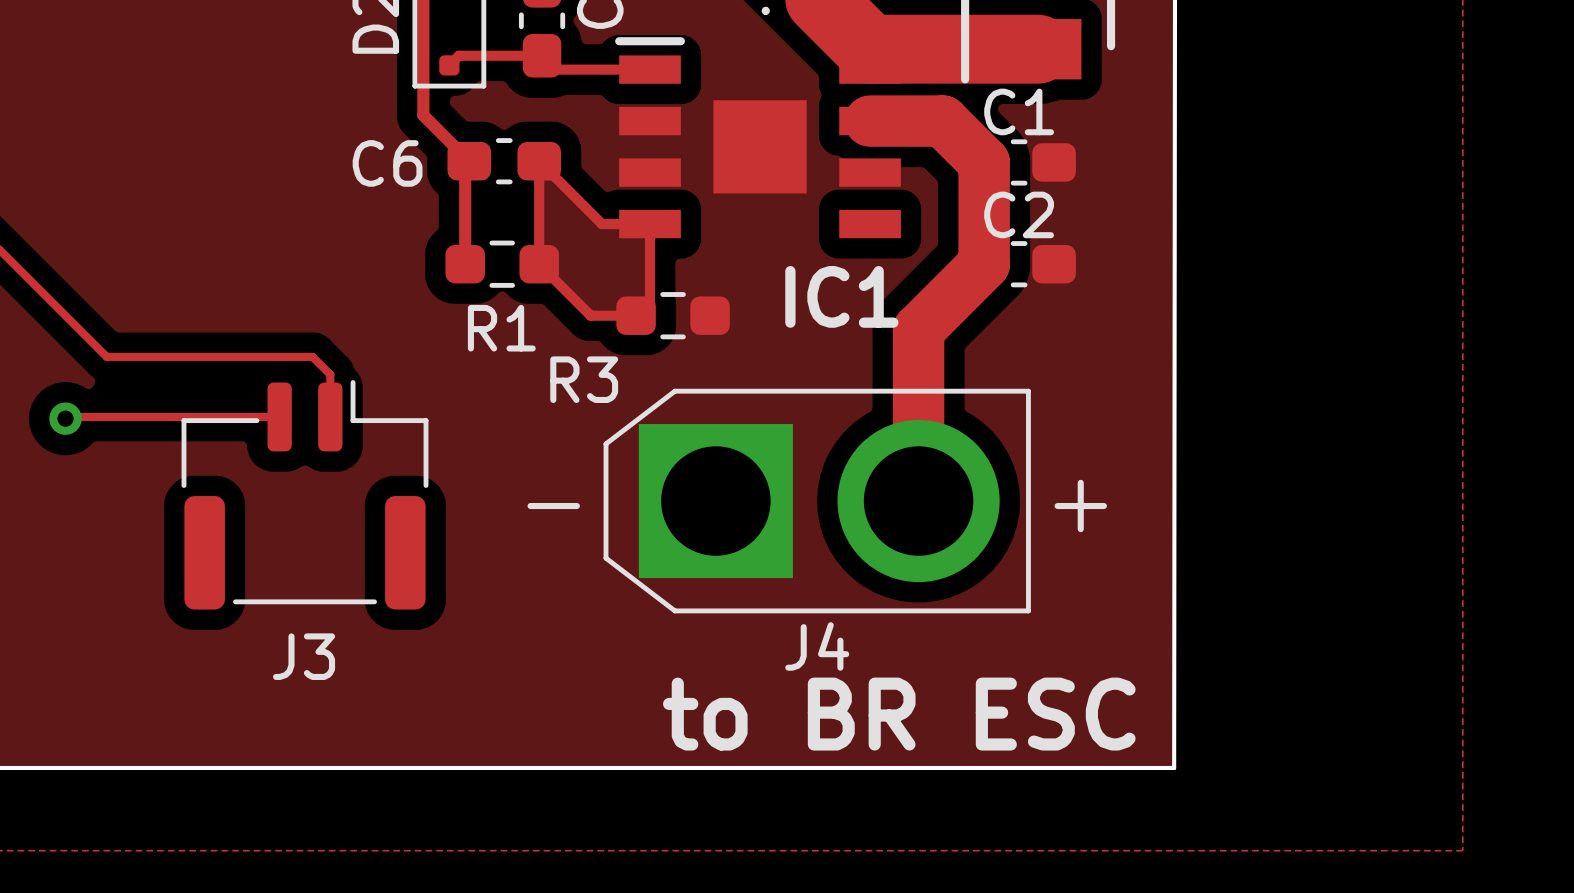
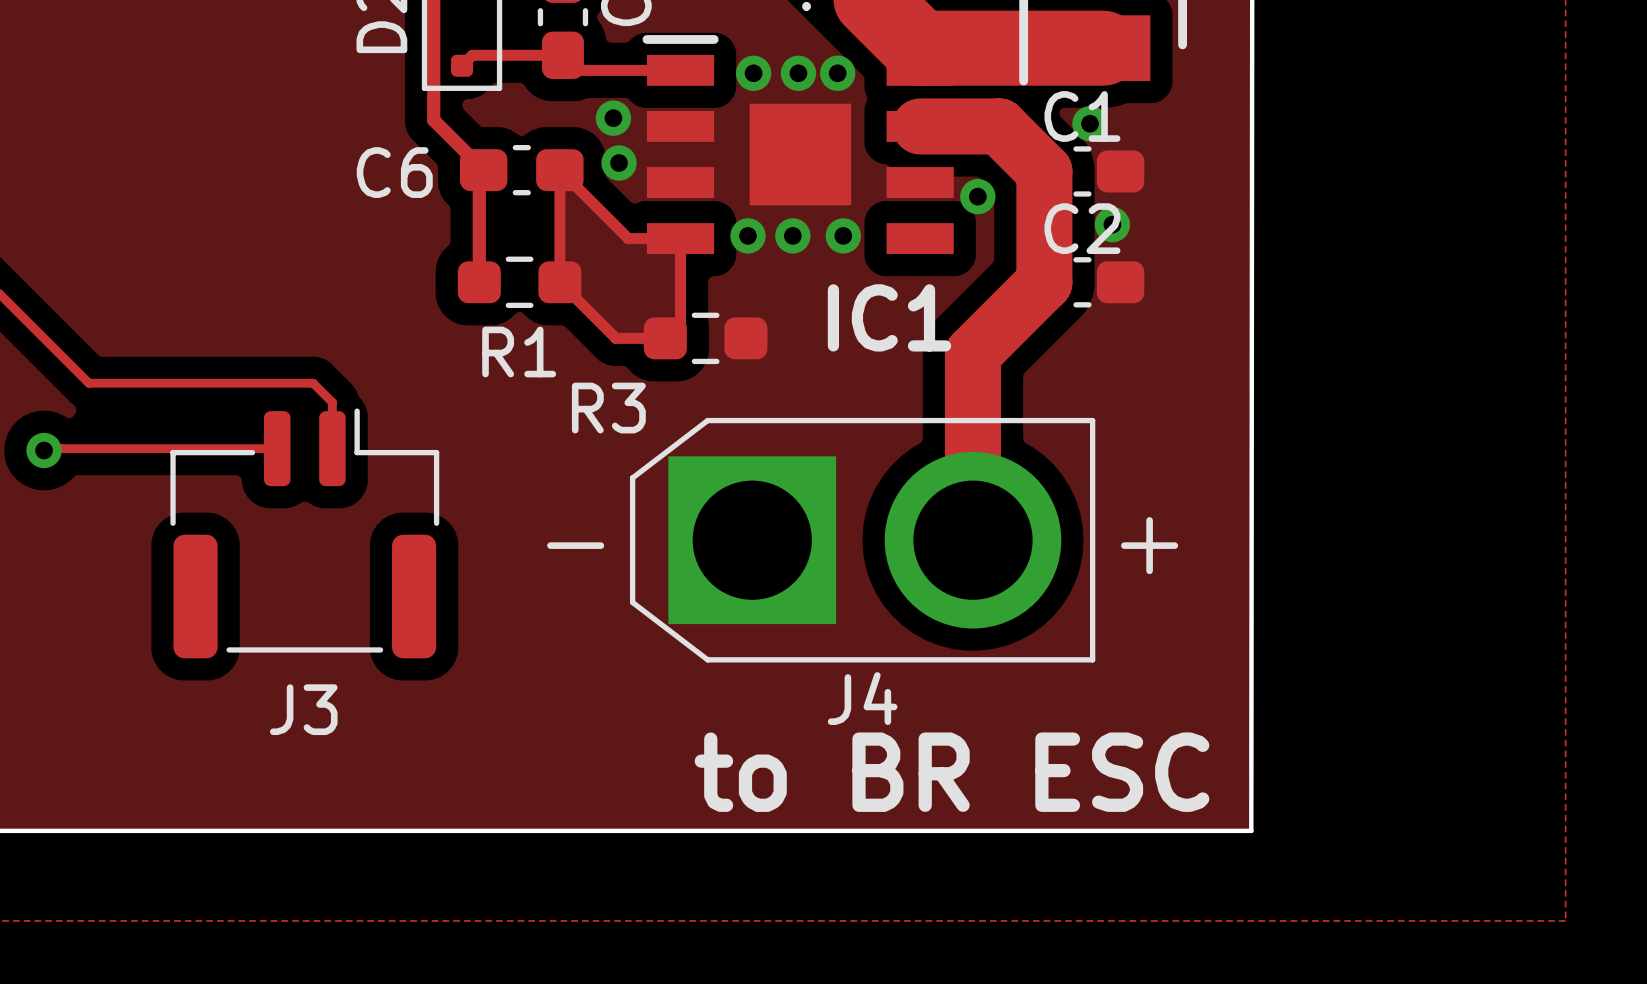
via: none -> (753, 73)
via: none -> (798, 73)
via: none -> (837, 73)
via: none -> (613, 118)
via: none -> (1089, 123)
via: none -> (619, 163)
via: none -> (977, 196)
via: none -> (1112, 224)
via: none -> (747, 235)
via: none -> (792, 235)
via: none -> (843, 235)

